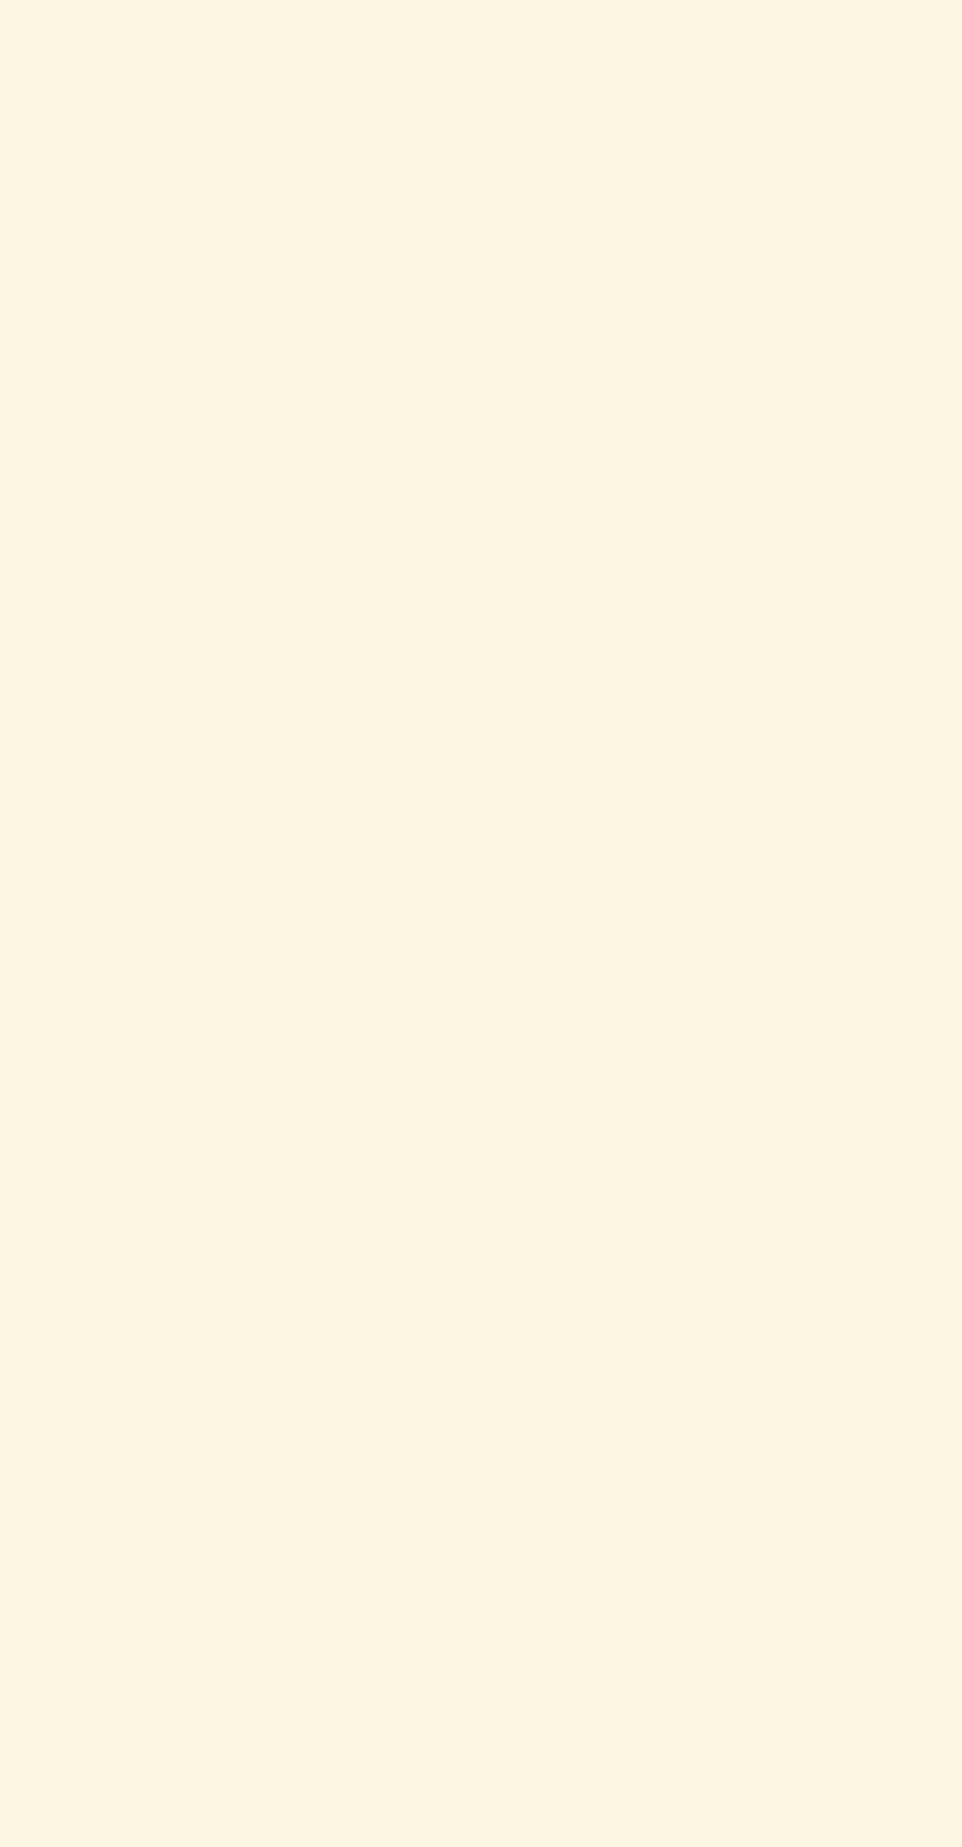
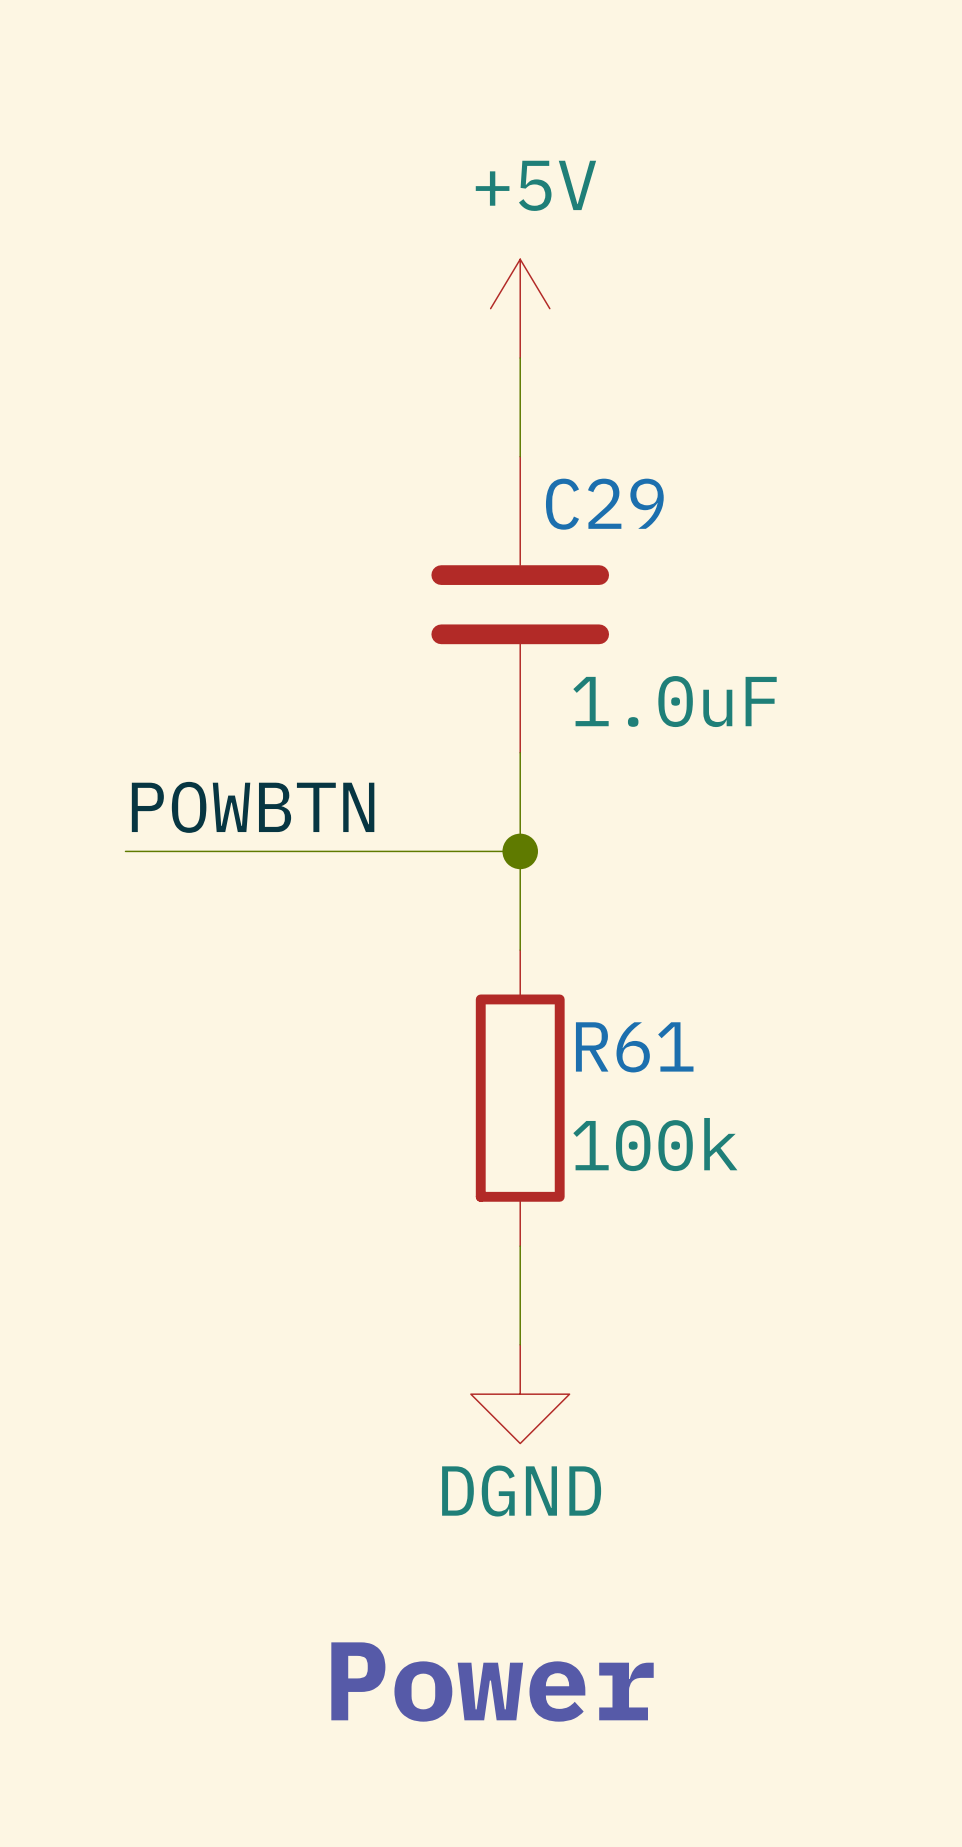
power symbol: none -> +5V (520, 308)
wire: none -> (520, 357) (520, 456)
C29: none -> 1.0uF (520, 604)
wire: none -> (520, 752) (520, 950)
label: none -> POWBTN (253, 807)
wire: none -> (125, 851) (520, 851)
junction: none -> (520, 851)
R61: none -> 100k (520, 1098)
wire: none -> (520, 1246) (520, 1344)
power symbol: none -> DGND (520, 1394)
text: none -> Power (492, 1682)

